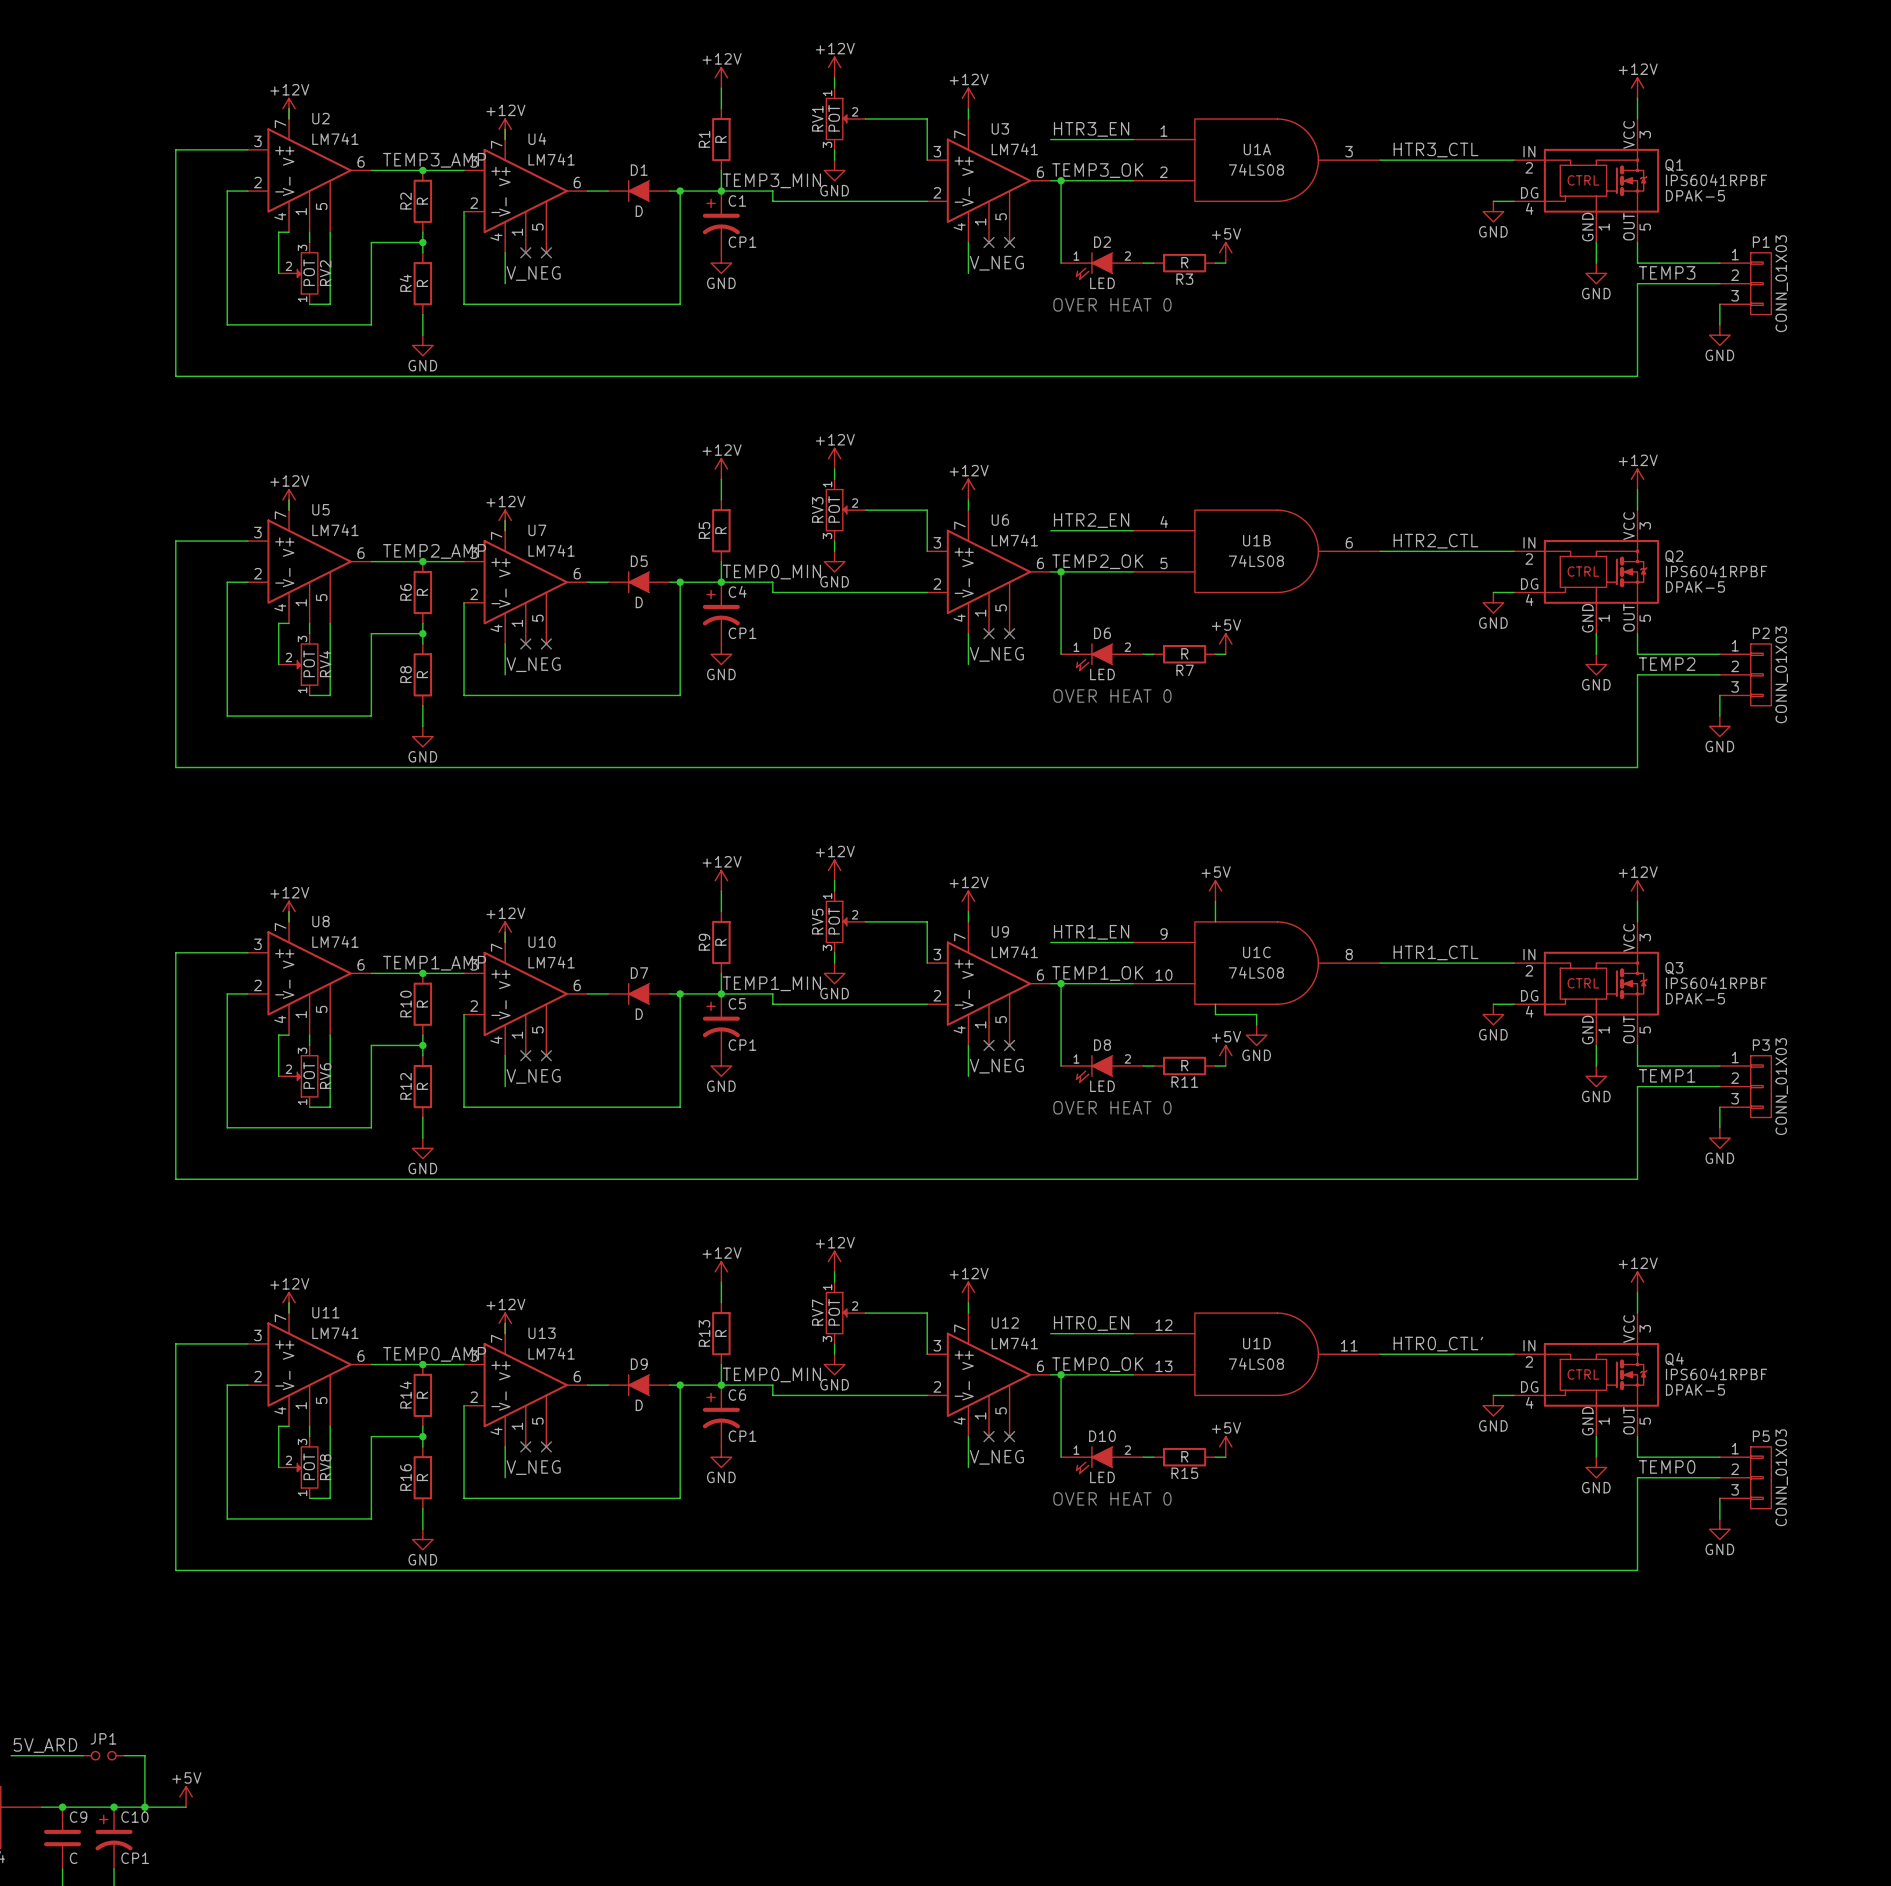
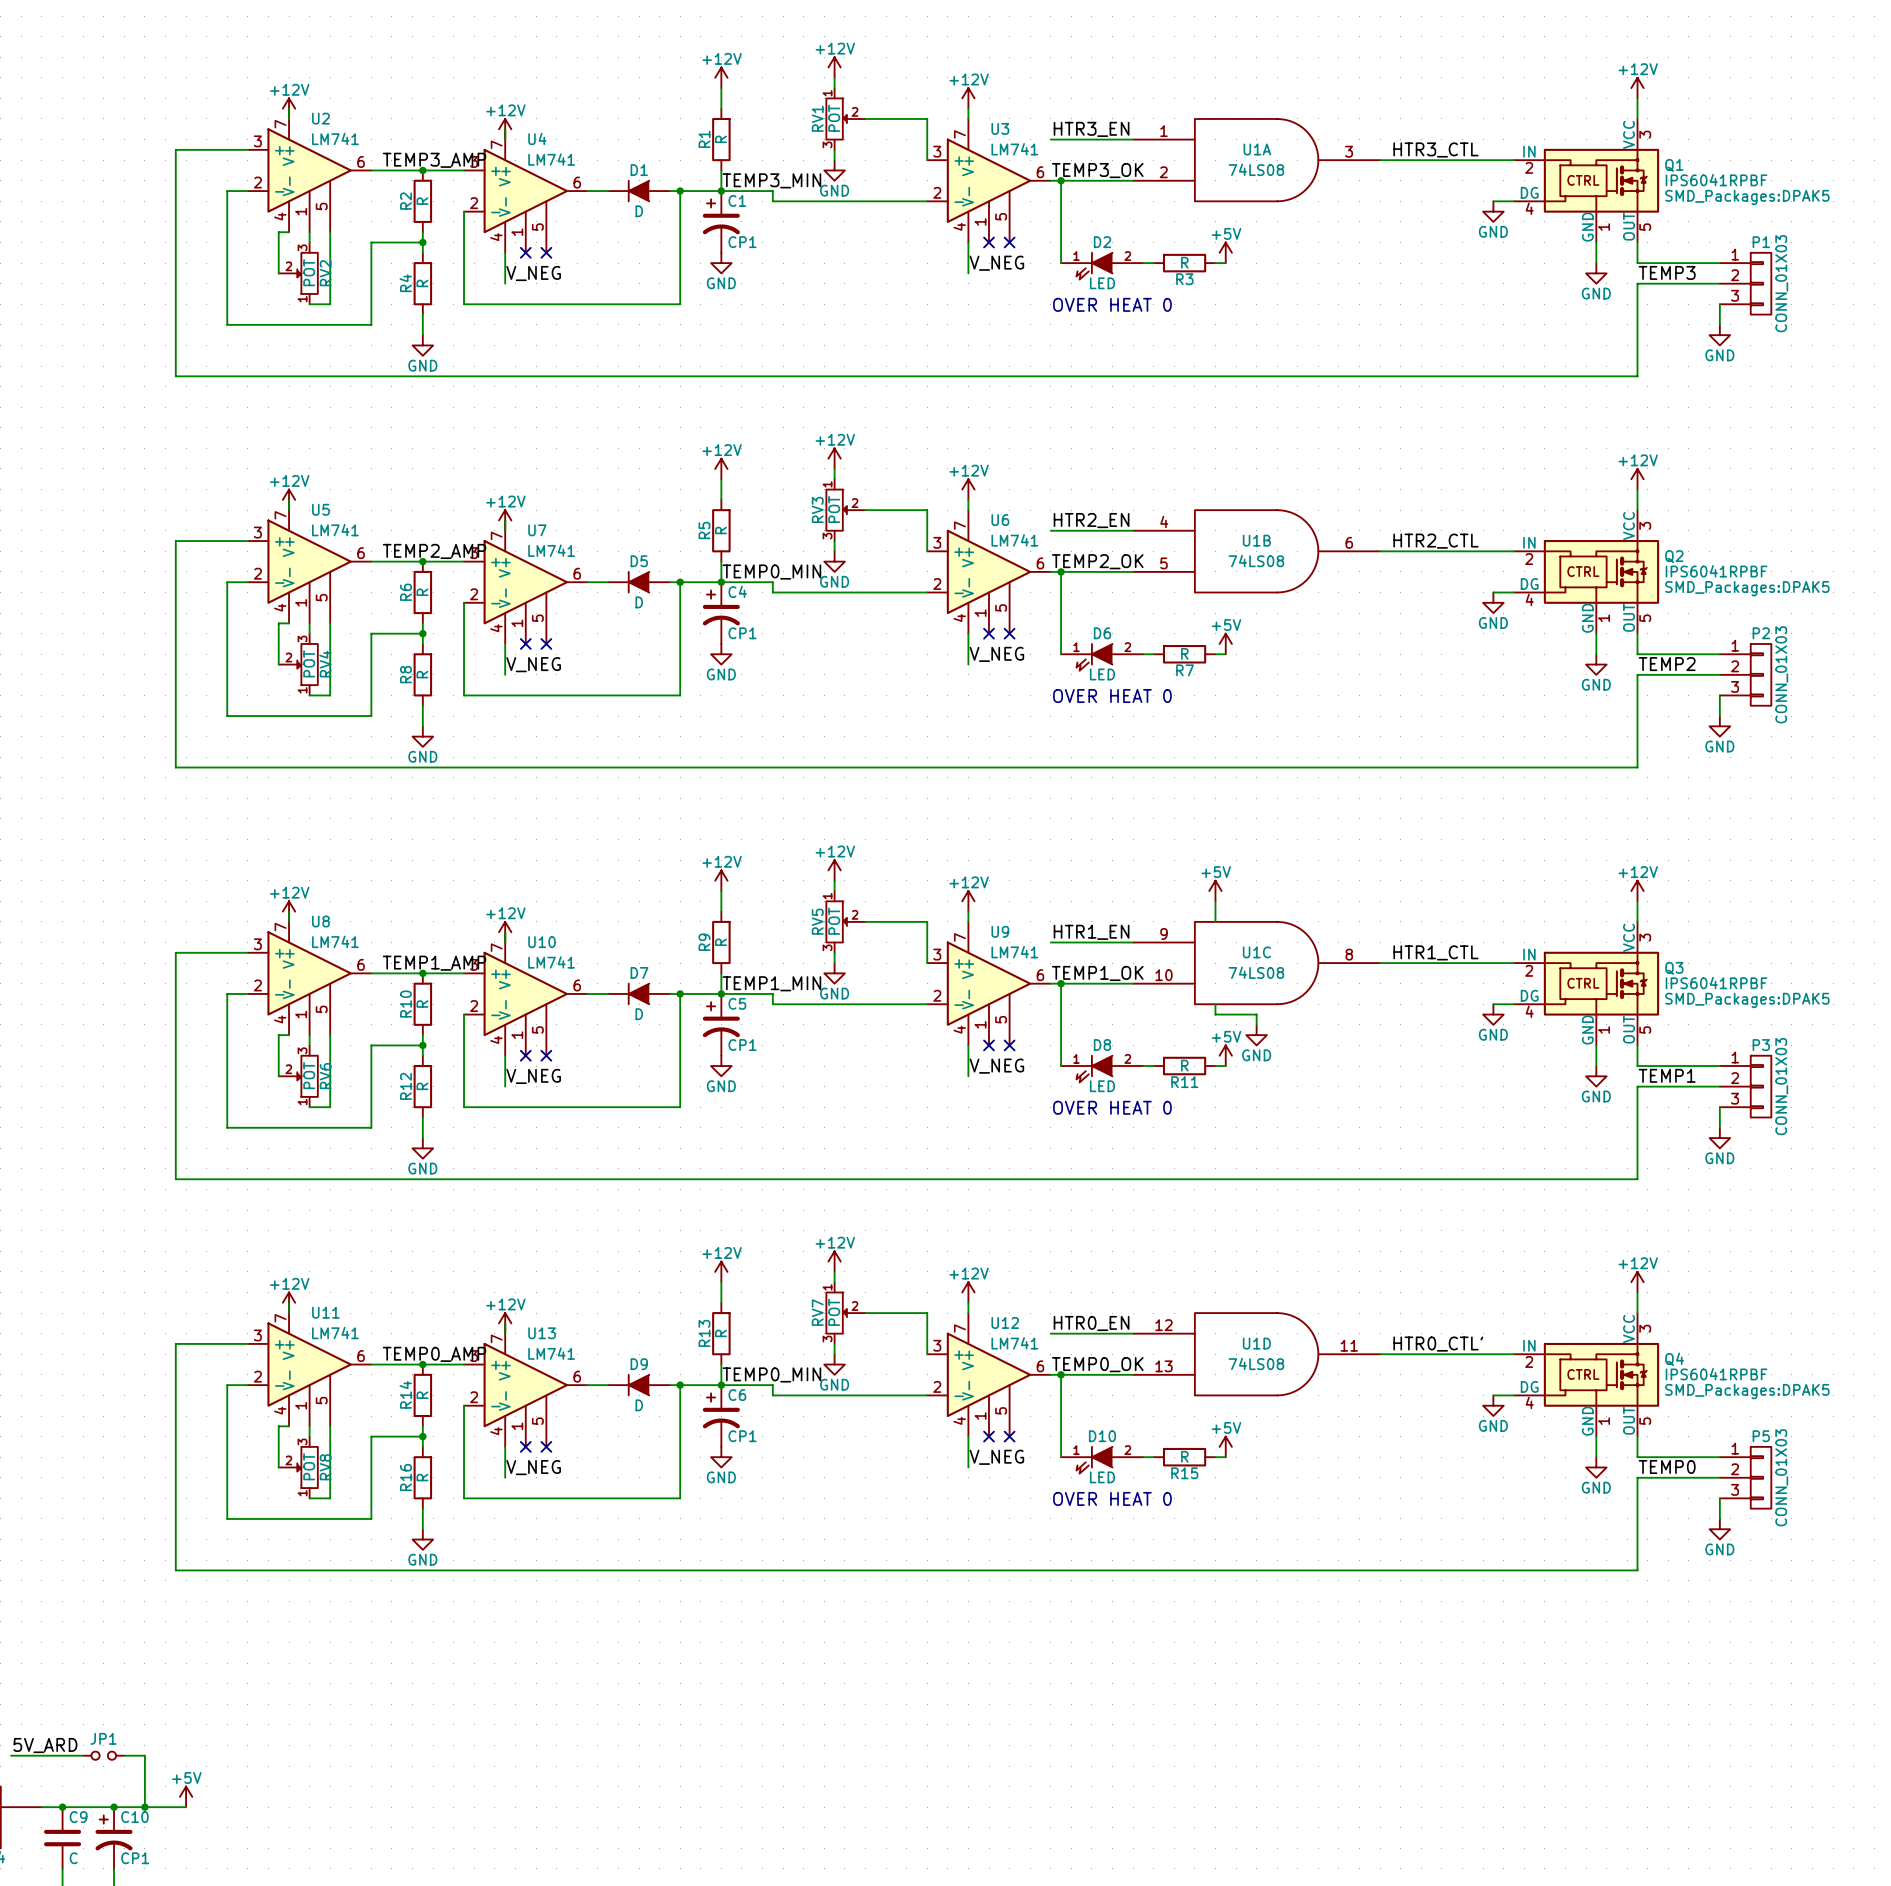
Q1 text: DPAK-5 (1695, 195) -> SMD_Packages:DPAK5 (1747, 197)
Q2 text: DPAK-5 (1695, 586) -> SMD_Packages:DPAK5 (1747, 588)
Q3 text: DPAK-5 (1695, 998) -> SMD_Packages:DPAK5 (1747, 1000)
Q4 text: DPAK-5 (1695, 1389) -> SMD_Packages:DPAK5 (1747, 1391)

